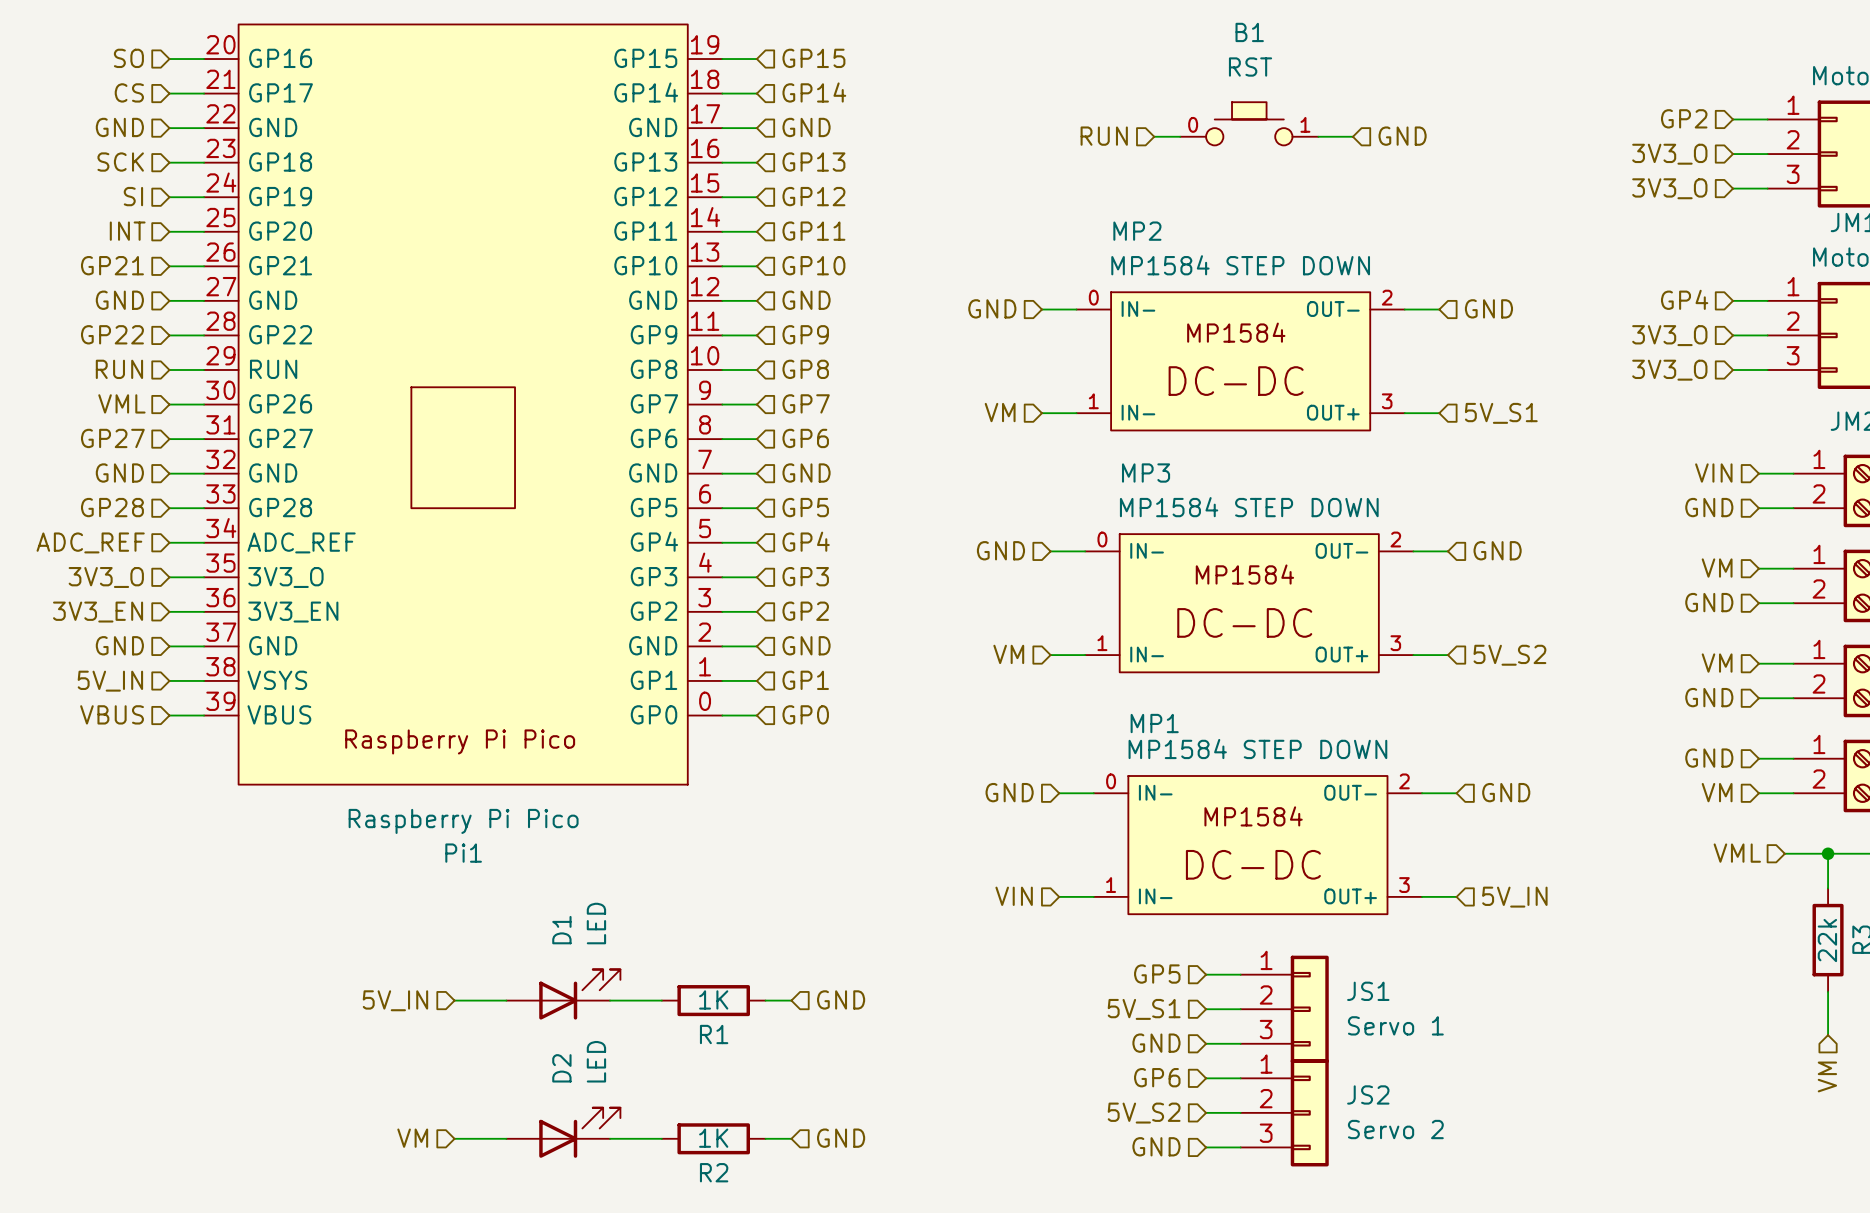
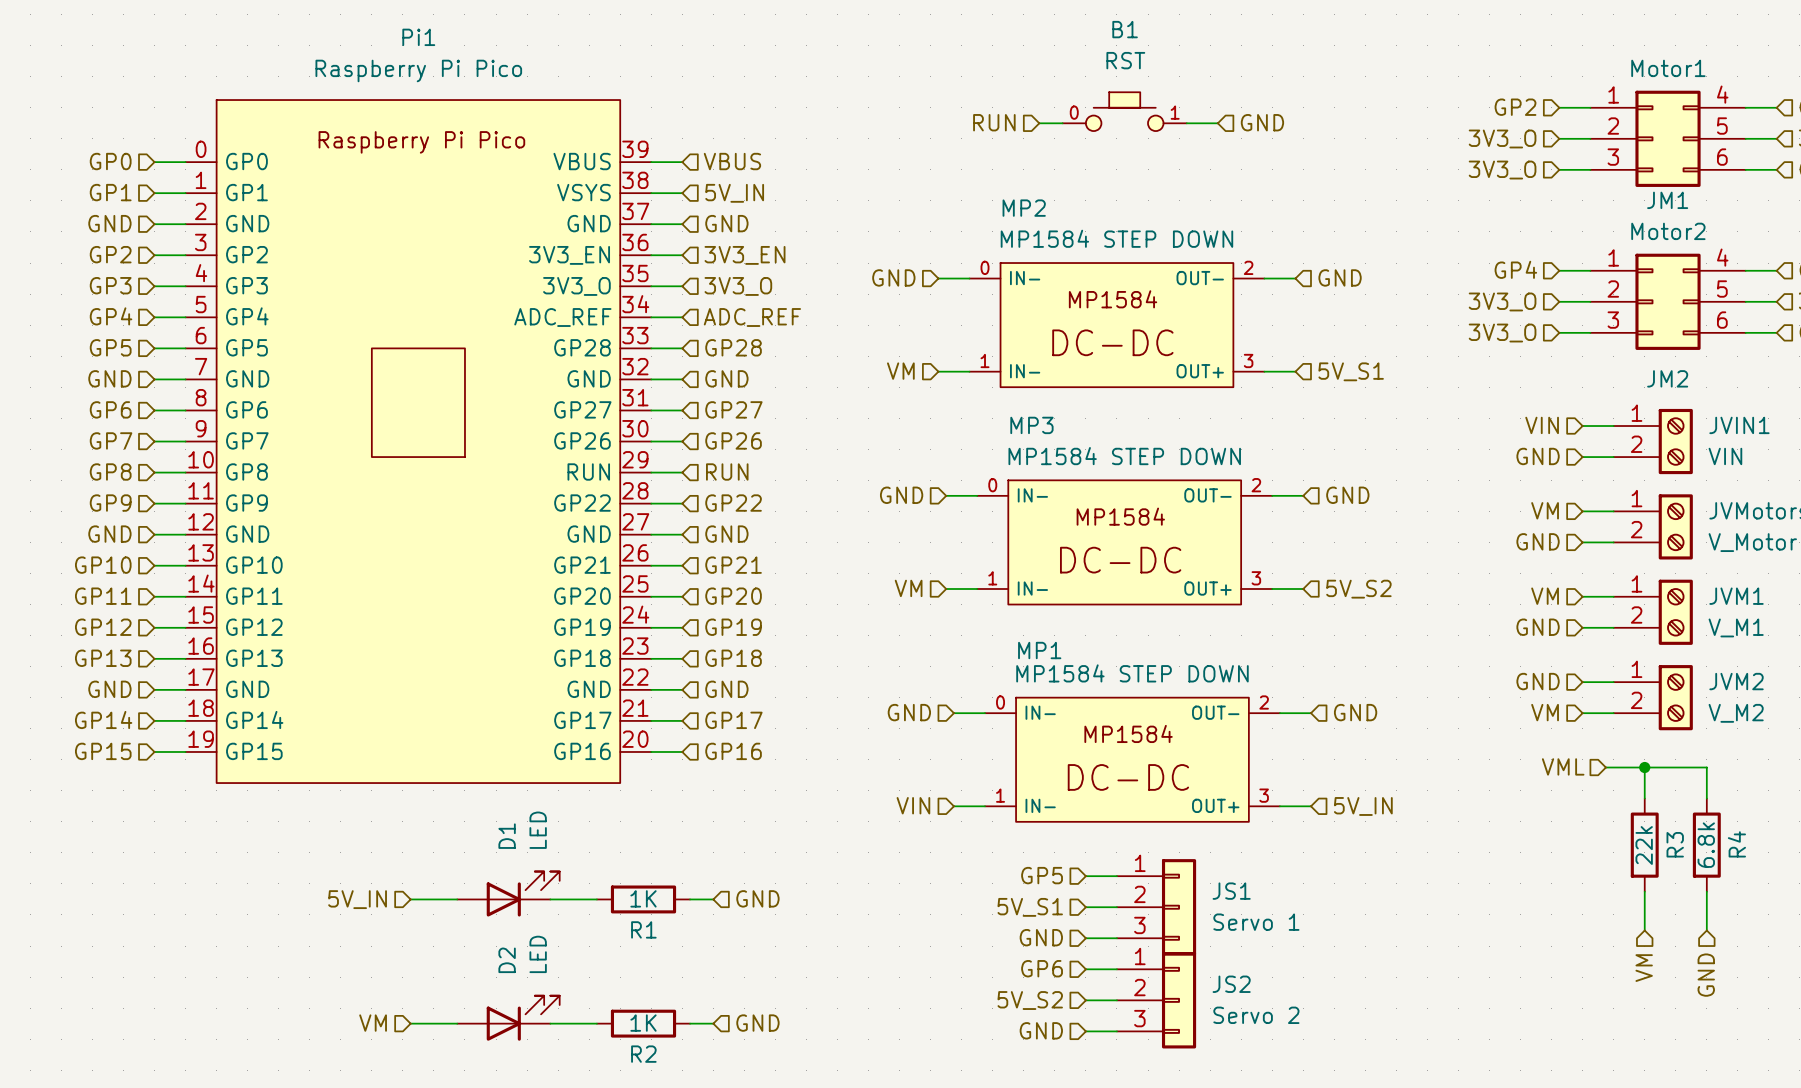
hierarchical label: SO (128, 58) -> none
hierarchical label: GP15 (813, 58) -> none
wire: (169, 59) (204, 59) -> (154, 162) (185, 162)
wire: (722, 59) (756, 59) -> (651, 162) (682, 162)
hierarchical label: CS (129, 92) -> none
hierarchical label: GP14 (814, 92) -> none
wire: (169, 93) (204, 93) -> (154, 193) (185, 193)
wire: (722, 93) (756, 93) -> (651, 193) (682, 193)
hierarchical label: GND (119, 127) -> none
hierarchical label: GND (806, 127) -> none
wire: (169, 128) (204, 128) -> (154, 224) (185, 224)
wire: (722, 128) (756, 128) -> (651, 224) (682, 224)
hierarchical label: SCK (120, 162) -> none
wire: (169, 162) (204, 162) -> (154, 255) (185, 255)
wire: (722, 162) (756, 162) -> (651, 255) (682, 255)
hierarchical label: GP13 (813, 162) -> none
hierarchical label: none -> GP0 (110, 161)
hierarchical label: none -> VBUS (732, 161)
hierarchical label: SI (133, 196) -> none
hierarchical label: GP12 (813, 196) -> none
wire: (169, 197) (204, 197) -> (154, 286) (185, 286)
wire: (722, 197) (756, 197) -> (651, 286) (682, 286)
hierarchical label: none -> GP1 (110, 192)
hierarchical label: none -> 5V_IN (734, 193)
hierarchical label: INT (127, 231) -> none
wire: (169, 231) (204, 231) -> (154, 317) (185, 317)
wire: (722, 231) (756, 231) -> (651, 317) (682, 317)
hierarchical label: GP11 (813, 231) -> none
hierarchical label: GP21 (112, 265) -> GP2 (110, 254)
hierarchical label: GP10 (813, 265) -> none
wire: (169, 266) (204, 266) -> (154, 348) (185, 348)
wire: (722, 266) (756, 266) -> (651, 348) (682, 348)
hierarchical label: none -> 3V3_EN (745, 255)
hierarchical label position: GND (119, 300) -> GND (109, 223)
wire: (169, 300) (204, 300) -> (154, 379) (185, 379)
wire: (722, 300) (756, 300) -> (651, 379) (682, 379)
hierarchical label position: GND (806, 300) -> GND (726, 223)
hierarchical label: none -> GP3 (110, 285)
hierarchical label: none -> 3V3_O (738, 286)
hierarchical label: GP22 (112, 334) -> none
hierarchical label: GP9 (805, 334) -> none
wire: (169, 335) (204, 335) -> (154, 410) (185, 410)
wire: (722, 335) (756, 335) -> (651, 410) (682, 410)
hierarchical label: none -> GP4 (111, 316)
hierarchical label: none -> ADC_REF (752, 317)
hierarchical label: RUN (119, 369) -> none
wire: (169, 369) (204, 369) -> (154, 441) (185, 441)
wire: (722, 369) (756, 369) -> (651, 441) (682, 441)
hierarchical label: GP8 (805, 369) -> GP28 (733, 347)
hierarchical label: none -> GP5 (110, 347)
hierarchical label: VML (121, 403) -> none
hierarchical label: GP7 (806, 403) -> none
wire: (169, 404) (204, 404) -> (154, 472) (185, 472)
Pi1 rotation: 0° (463, 404) -> 180° (418, 441)
wire: (722, 404) (756, 404) -> (651, 472) (682, 472)
hierarchical label: GP27 (112, 438) -> none
hierarchical label: GP6 (805, 438) -> none
wire: (169, 439) (204, 439) -> (154, 503) (185, 503)
wire: (722, 439) (756, 439) -> (651, 503) (682, 503)
hierarchical label: none -> GP6 (110, 409)
hierarchical label: none -> GP27 (733, 409)
hierarchical label position: GND (119, 473) -> GND (109, 378)
wire: (169, 473) (204, 473) -> (154, 534) (185, 534)
wire: (722, 473) (756, 473) -> (651, 534) (682, 534)
hierarchical label position: GND (806, 473) -> GND (726, 378)
hierarchical label: none -> GP7 (111, 440)
hierarchical label: none -> GP26 (733, 440)
hierarchical label: GP28 (112, 507) -> GP8 (110, 471)
hierarchical label: GP5 (805, 507) -> none
wire: (169, 508) (204, 508) -> (154, 565) (185, 565)
wire: (722, 508) (756, 508) -> (651, 565) (682, 565)
hierarchical label: none -> RUN (727, 471)
hierarchical label: GP4 (806, 541) -> none
hierarchical label: ADC_REF (90, 542) -> none
wire: (169, 542) (204, 542) -> (154, 596) (185, 596)
wire: (722, 542) (756, 542) -> (651, 596) (682, 596)
hierarchical label: none -> GP9 (110, 503)
hierarchical label: none -> GP22 (733, 503)
hierarchical label: GP3 (805, 576) -> none
hierarchical label: 3V3_O (106, 577) -> none
wire: (169, 577) (204, 577) -> (154, 627) (185, 627)
wire: (722, 577) (756, 577) -> (651, 627) (682, 627)
wire: (169, 611) (204, 611) -> (154, 658) (185, 658)
wire: (722, 611) (756, 611) -> (651, 658) (682, 658)
hierarchical label: GP2 (805, 611) -> GP21 (733, 565)
hierarchical label: 3V3_EN (98, 612) -> none
hierarchical label: none -> GP10 (103, 565)
hierarchical label position: GND (119, 645) -> GND (109, 534)
hierarchical label position: GND (806, 645) -> GND (726, 534)
wire: (169, 646) (204, 646) -> (154, 689) (185, 689)
wire: (722, 646) (756, 646) -> (651, 689) (682, 689)
hierarchical label: none -> GP11 (103, 596)
hierarchical label: none -> GP20 (733, 596)
wire: (169, 680) (204, 680) -> (154, 720) (185, 720)
wire: (722, 680) (756, 680) -> (651, 720) (682, 720)
hierarchical label: GP1 (805, 680) -> GP19 (733, 627)
hierarchical label: 5V_IN (110, 681) -> none
hierarchical label: none -> GP12 (103, 627)
hierarchical label: VBUS (112, 714) -> none
hierarchical label: GP0 (805, 714) -> none
wire: (169, 715) (204, 715) -> (154, 751) (185, 751)
wire: (722, 715) (756, 715) -> (651, 751) (682, 751)
hierarchical label: none -> GP13 (103, 658)
hierarchical label: none -> GP18 (733, 658)
hierarchical label: none -> GND (109, 689)
hierarchical label: none -> GND (726, 689)
hierarchical label: none -> GP14 (103, 719)
hierarchical label: none -> GP17 (733, 720)
hierarchical label: none -> GP15 (103, 751)
hierarchical label: none -> GP16 (733, 751)

